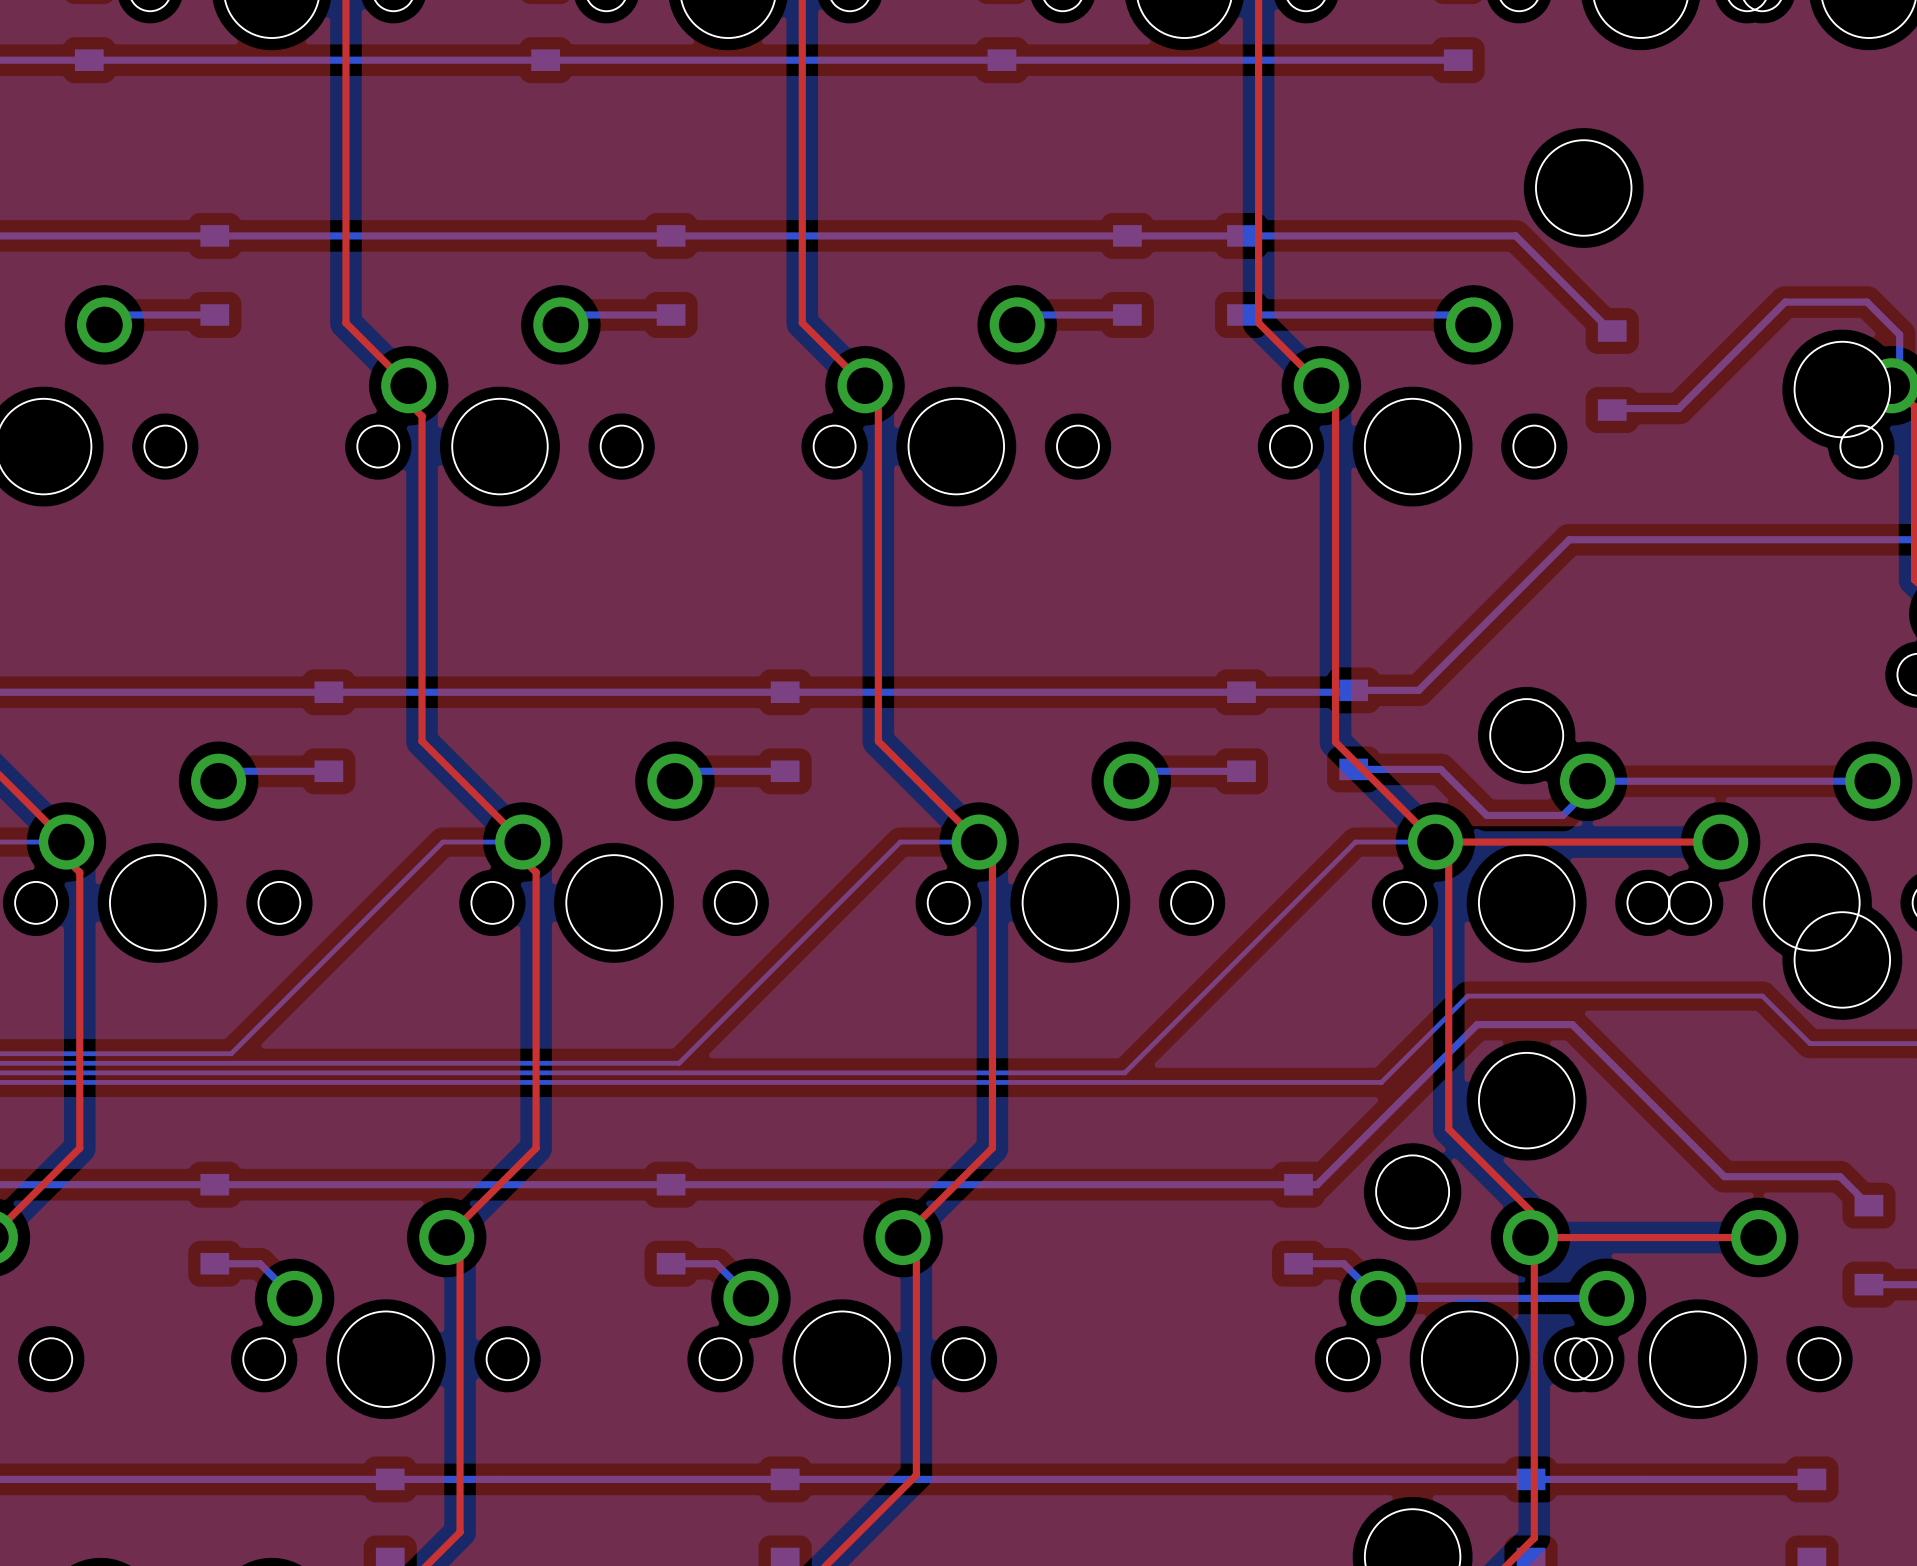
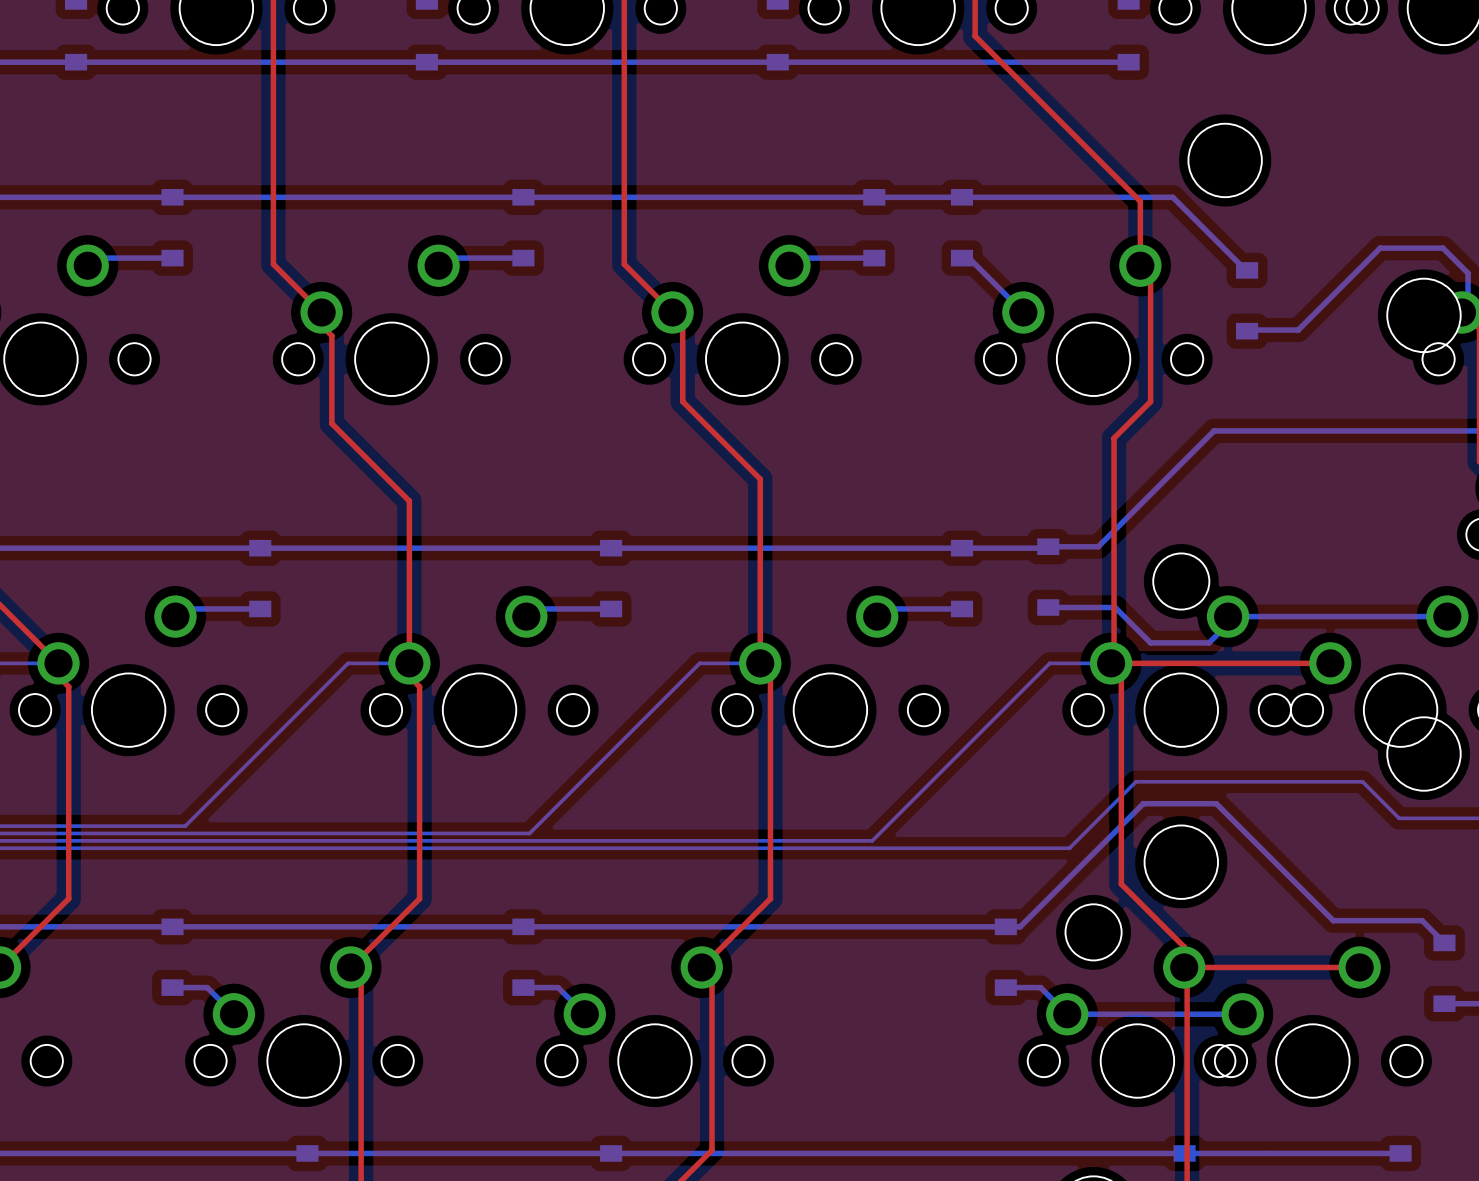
top track: (1258, 26) (1258, 322) (1321, 385) (1321, 388) -> none
bottom track: (1250, 314) (1463, 314) -> (968, 258) (1023, 312)
top track: (1335, 403) (1335, 742) (1435, 842) -> (975, 36) (1140, 201) (1140, 265) (1150, 275) (1150, 401) (1114, 438) (1114, 660) (1111, 663)
top track: (878, 501) (878, 741) (979, 842) -> (682, 401) (760, 479) (760, 663)
top track: (422, 530) (422, 741) (522, 842) -> (331, 423) (409, 501) (409, 663)

